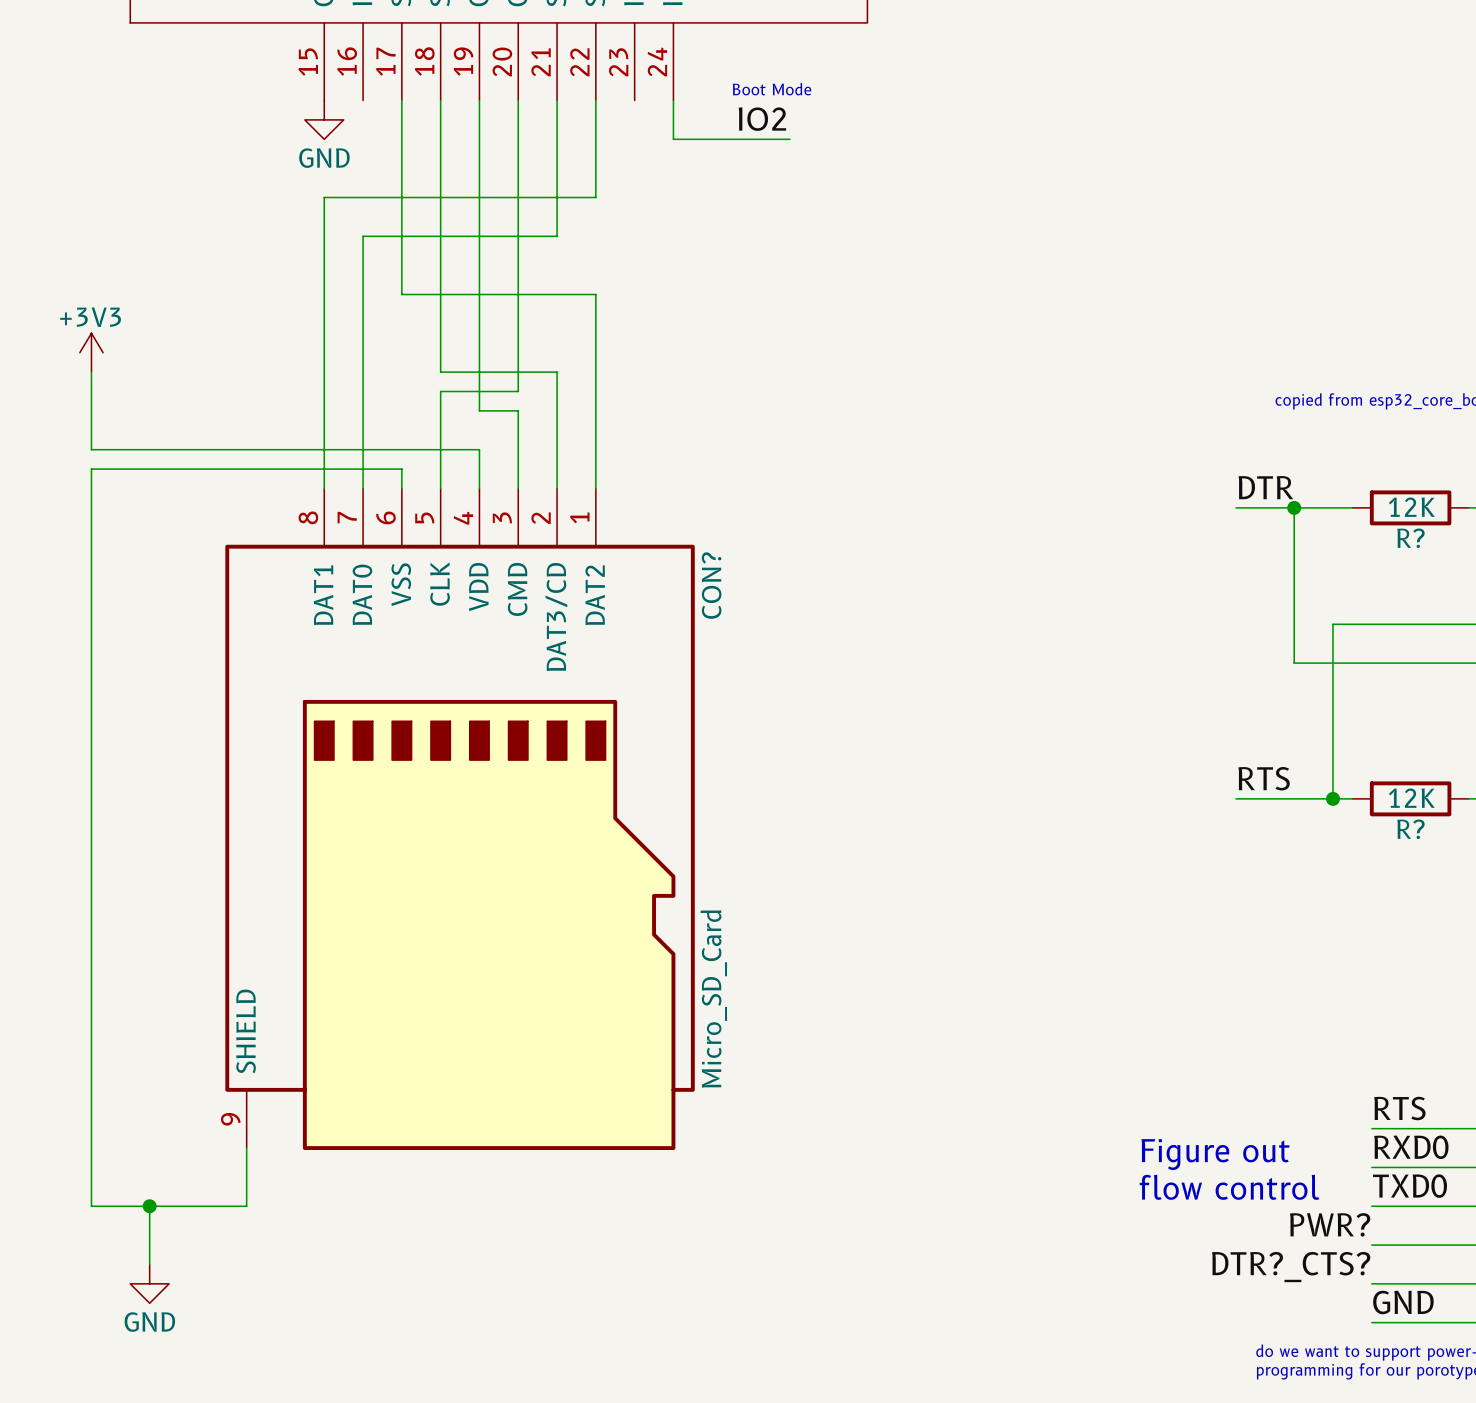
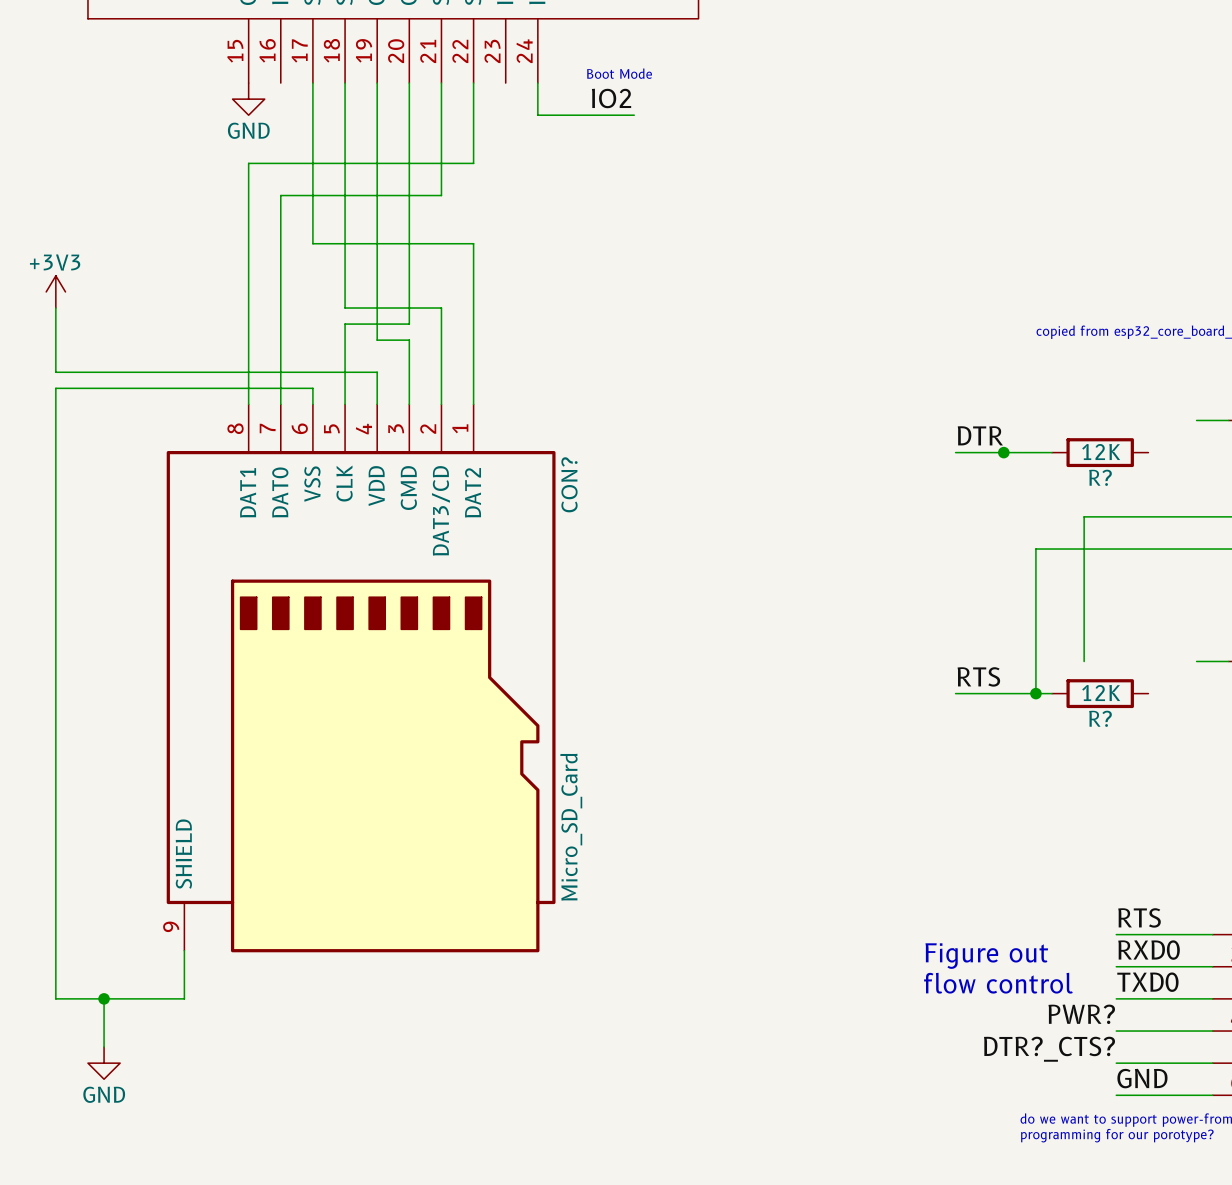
label position: DTR (1265, 487) -> DTR (980, 435)
wire: (1236, 507) (1352, 507) -> (955, 452) (1052, 452)
wire: (1294, 507) (1294, 663) -> (1035, 693) (1035, 549) (1052, 549)
junction position: (1294, 507) -> (1003, 452)
R? position: (1410, 507) -> (1100, 452)
label position: RTS (1264, 778) -> RTS (978, 676)
wire: (1236, 798) (1352, 798) -> (955, 693) (1052, 693)
junction position: (1333, 798) -> (1035, 693)
R? position: (1410, 798) -> (1100, 693)

